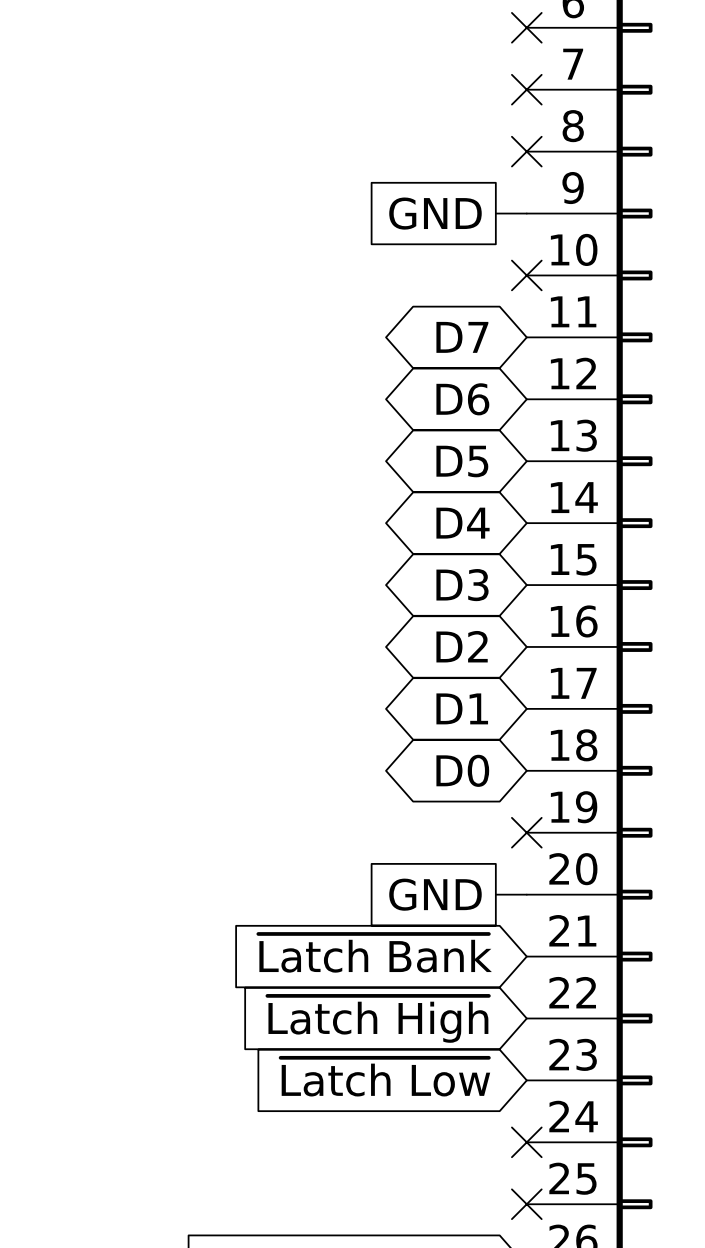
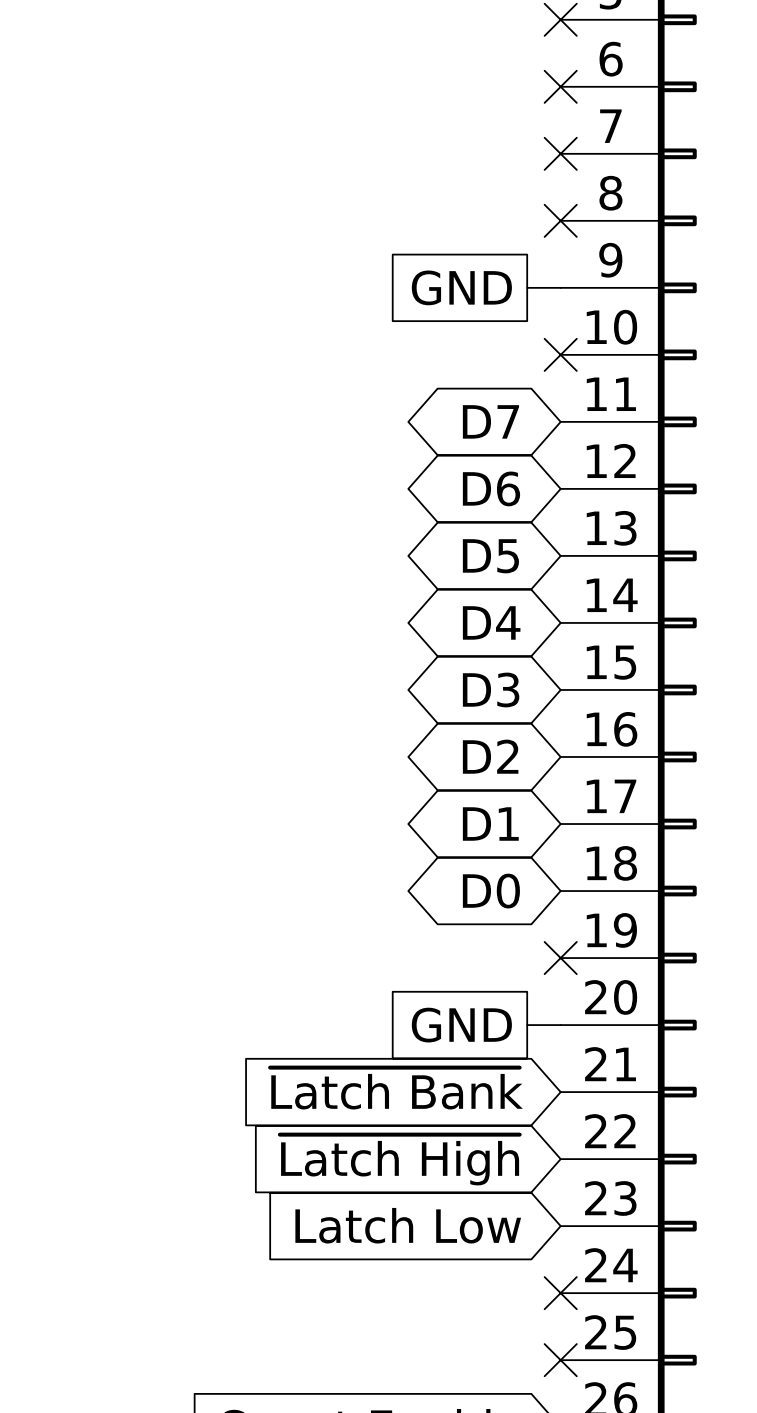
global label: ~{Latch Low} (385, 1077) -> Latch Low (408, 1225)

